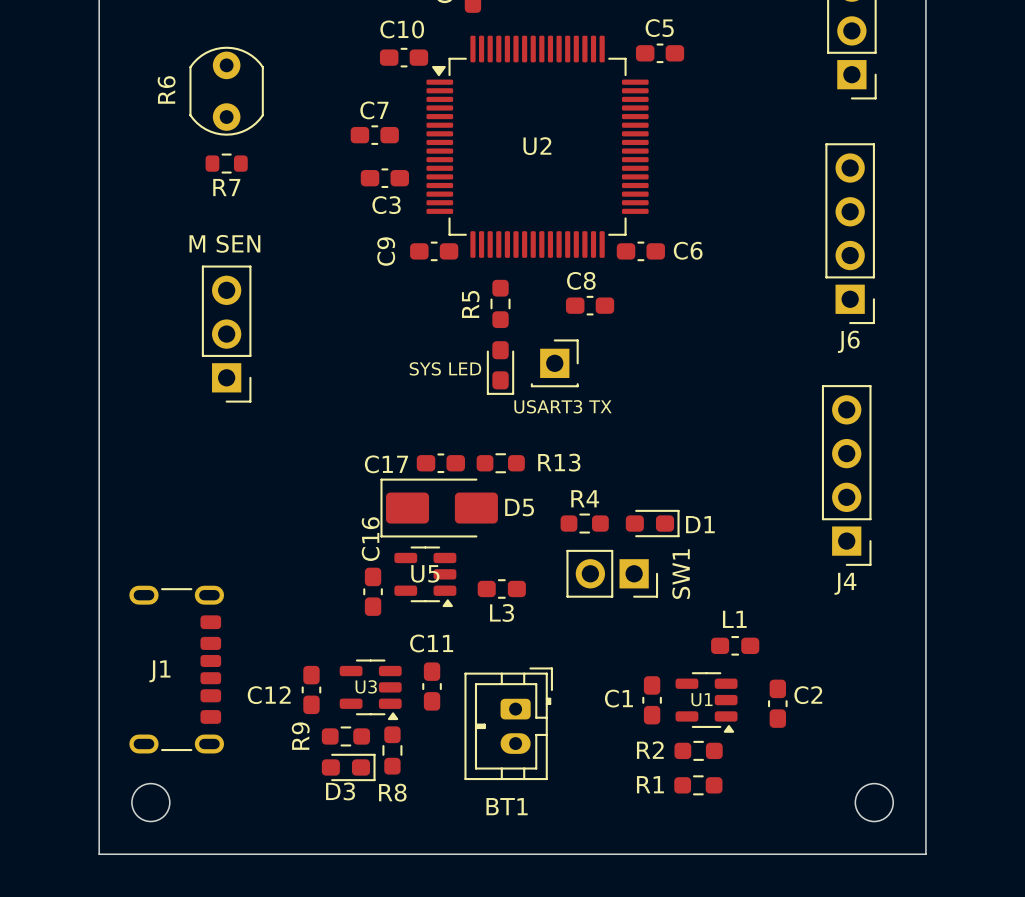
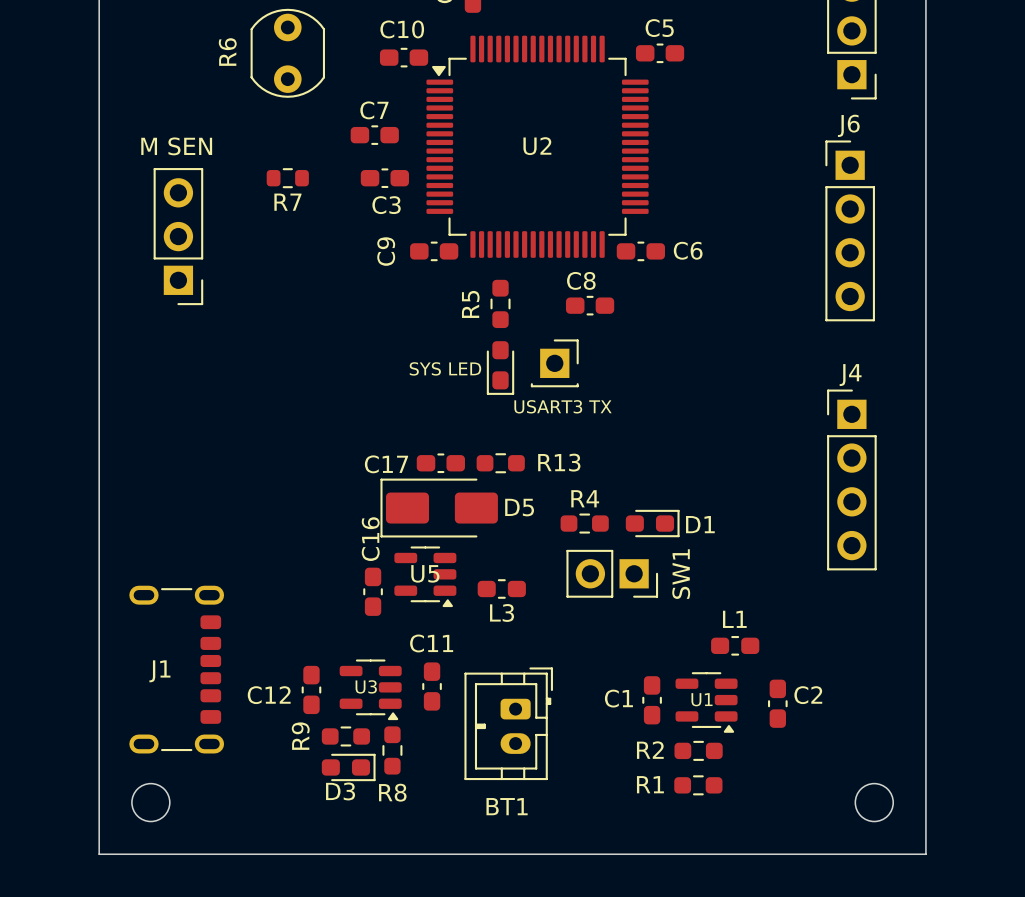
R6 position: (226, 91) -> (287, 53)
R7 position: (226, 163) -> (287, 178)
J6 rotation: 0° (850, 233) -> 180° (850, 230)
part position: (226, 334) -> (178, 236)
J4 rotation: 0° (846, 475) -> 180° (851, 479)

